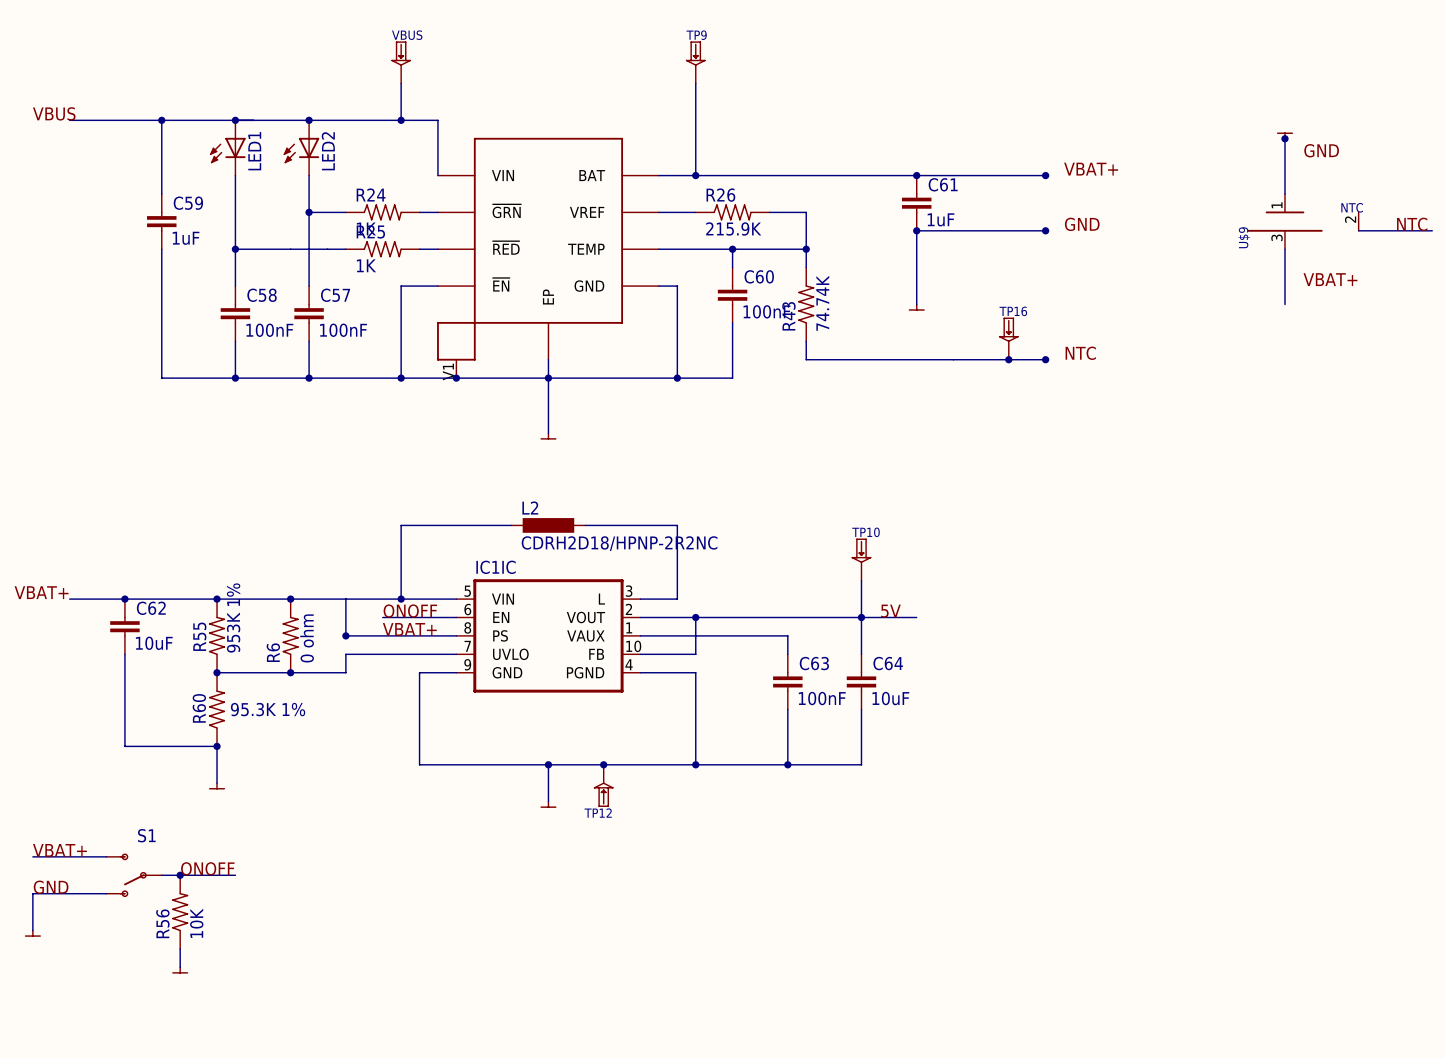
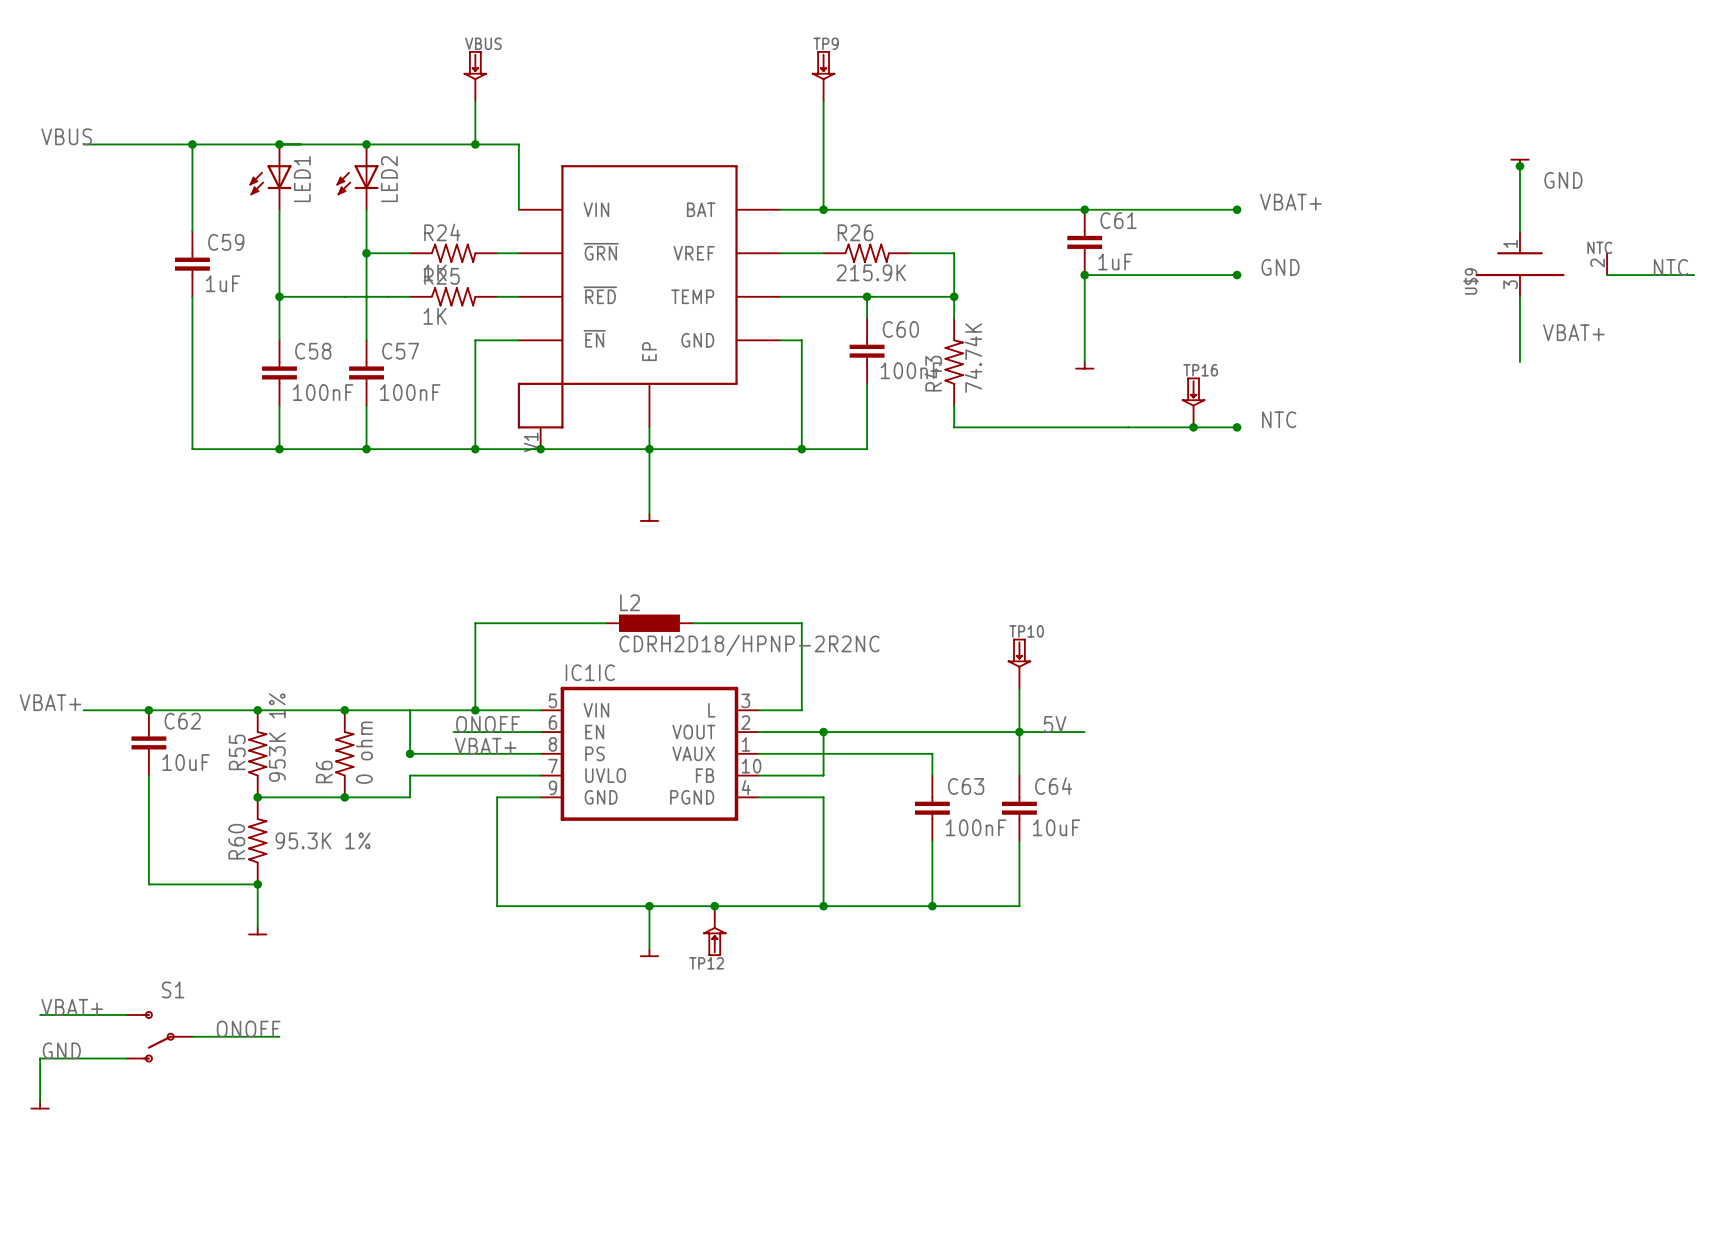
junction: (180, 875) -> none
R56: 10K (180, 912) -> none
wire: (180, 948) (180, 967) -> none
power symbol: (180, 970) -> none

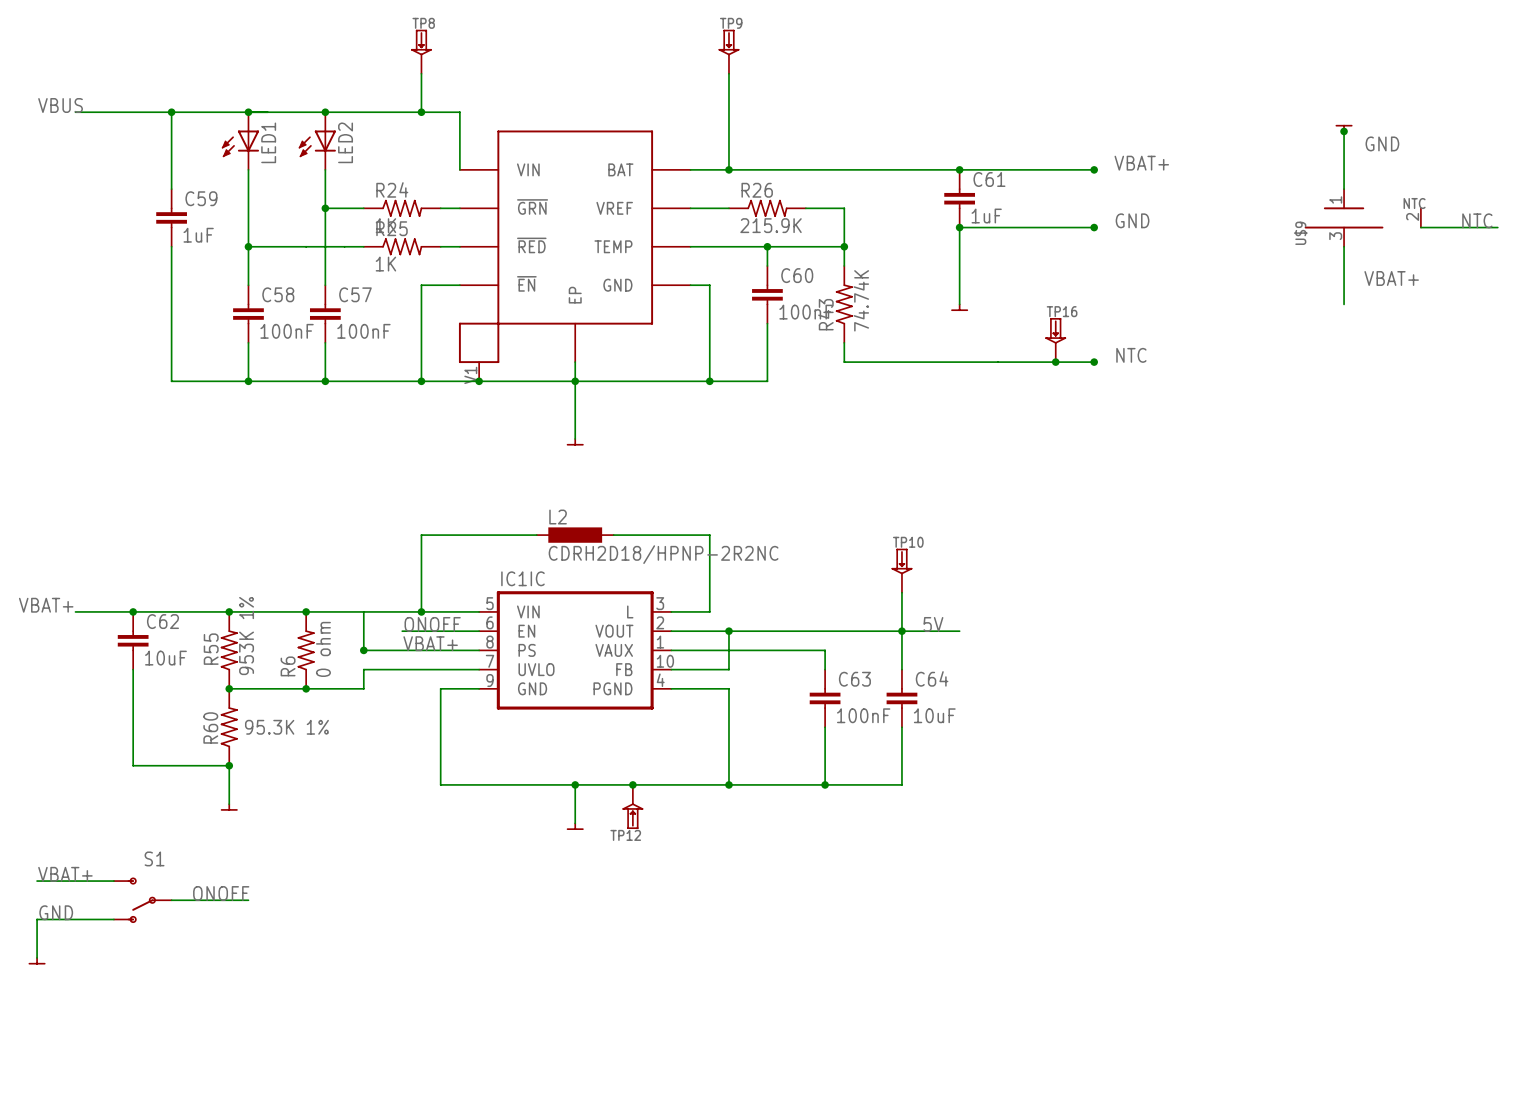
VBUS name: VBUS (483, 43) -> TP8 (423, 23)

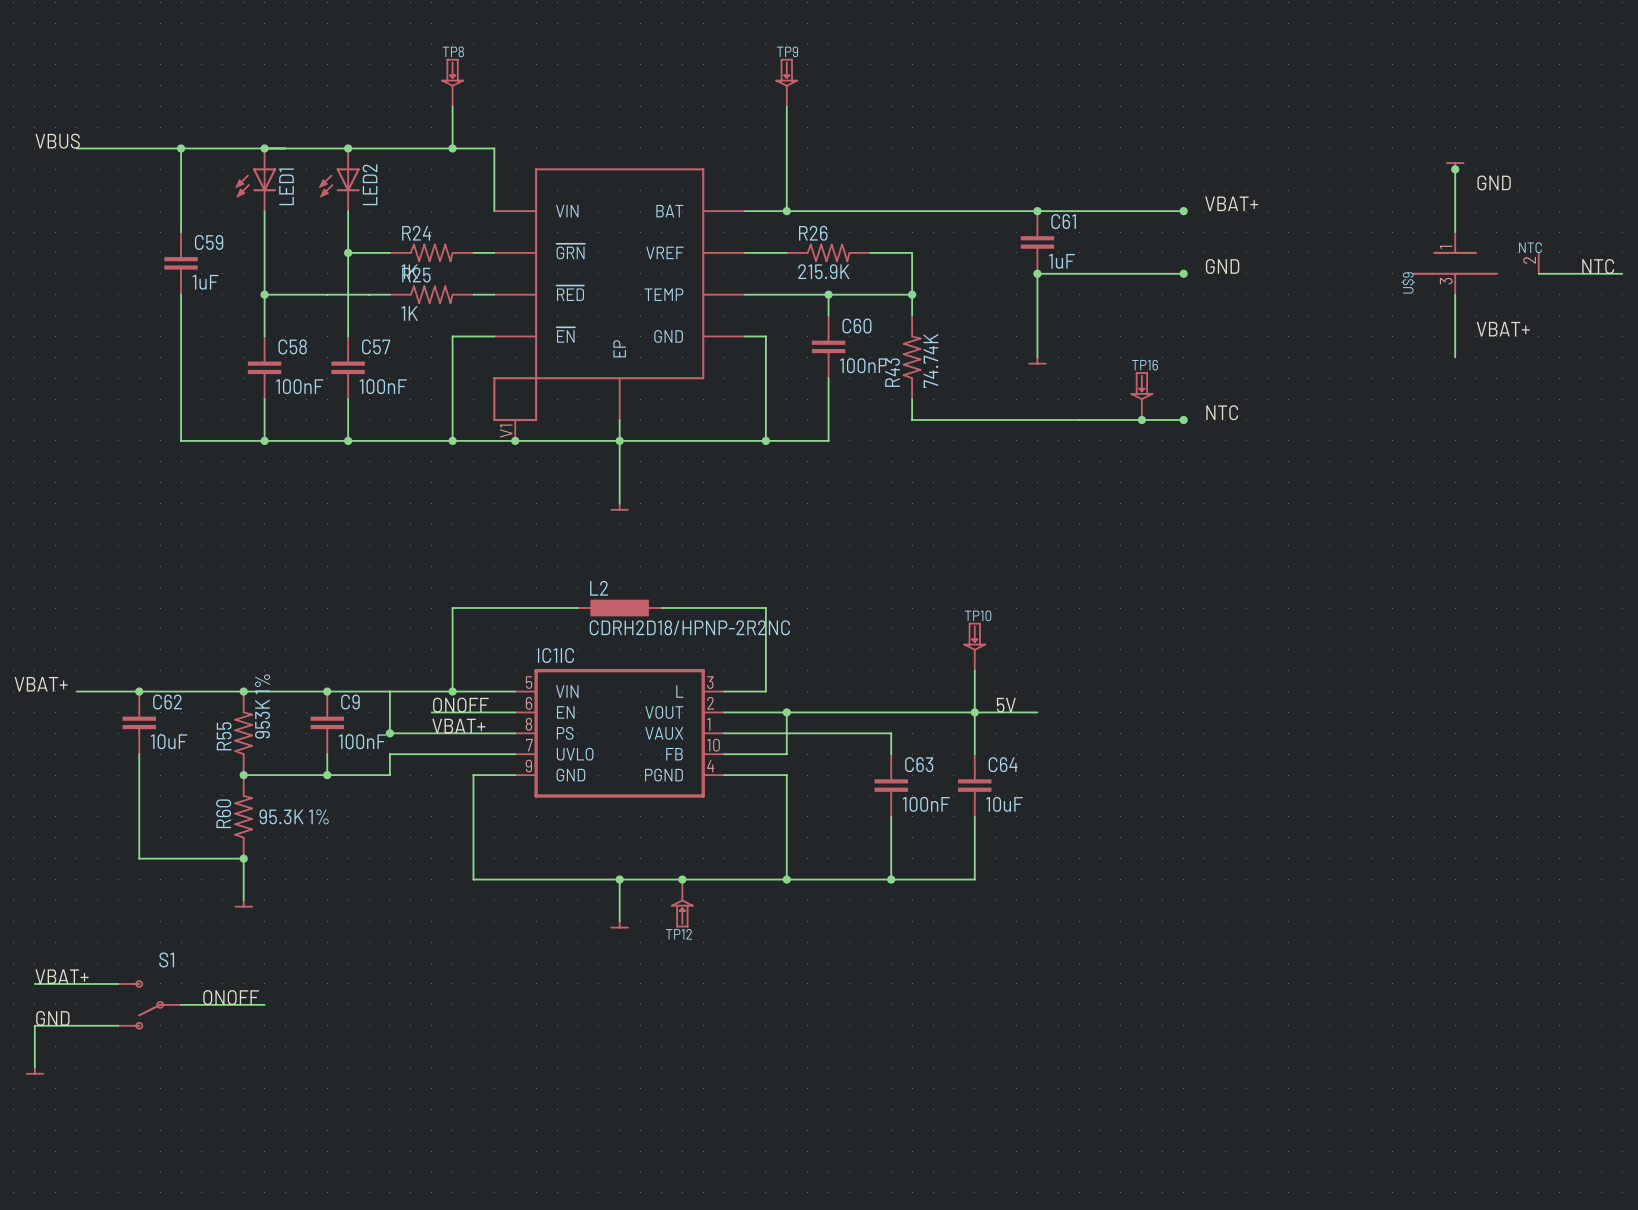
C9: none -> 100nF (327, 722)
R6: 0 ohm (306, 650) -> none

